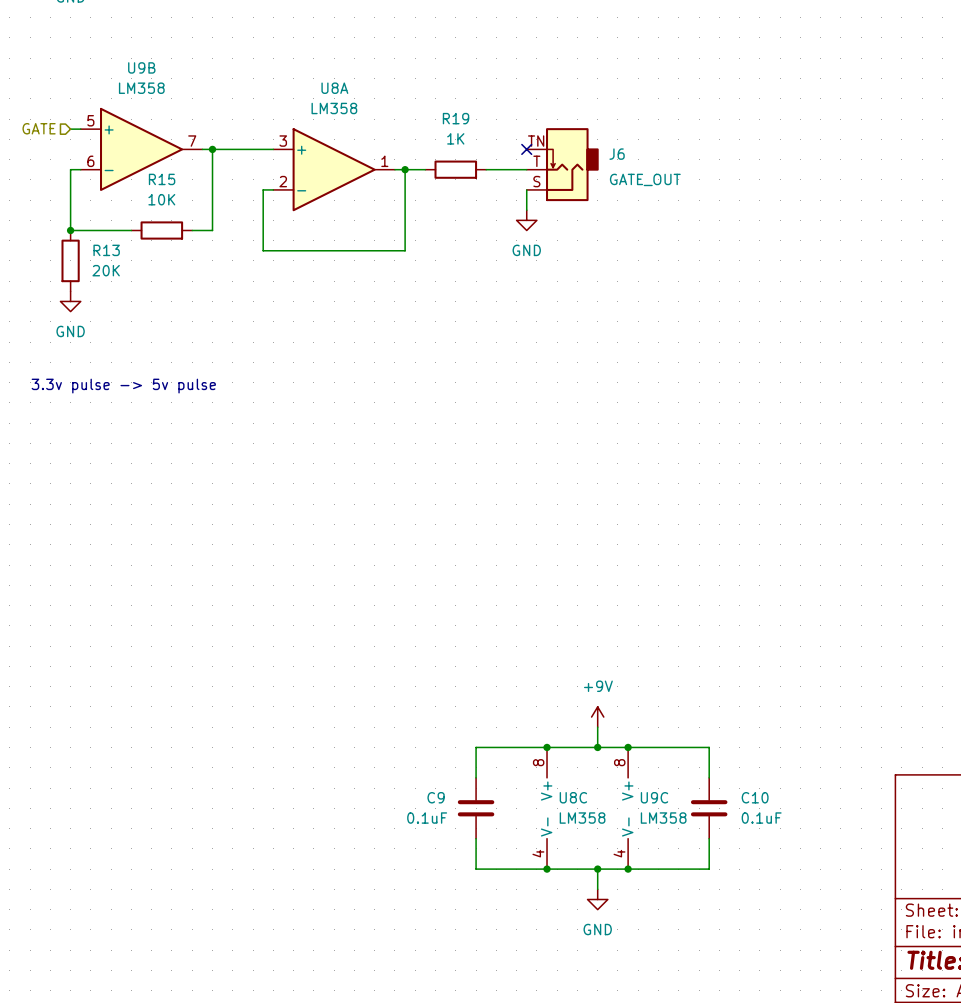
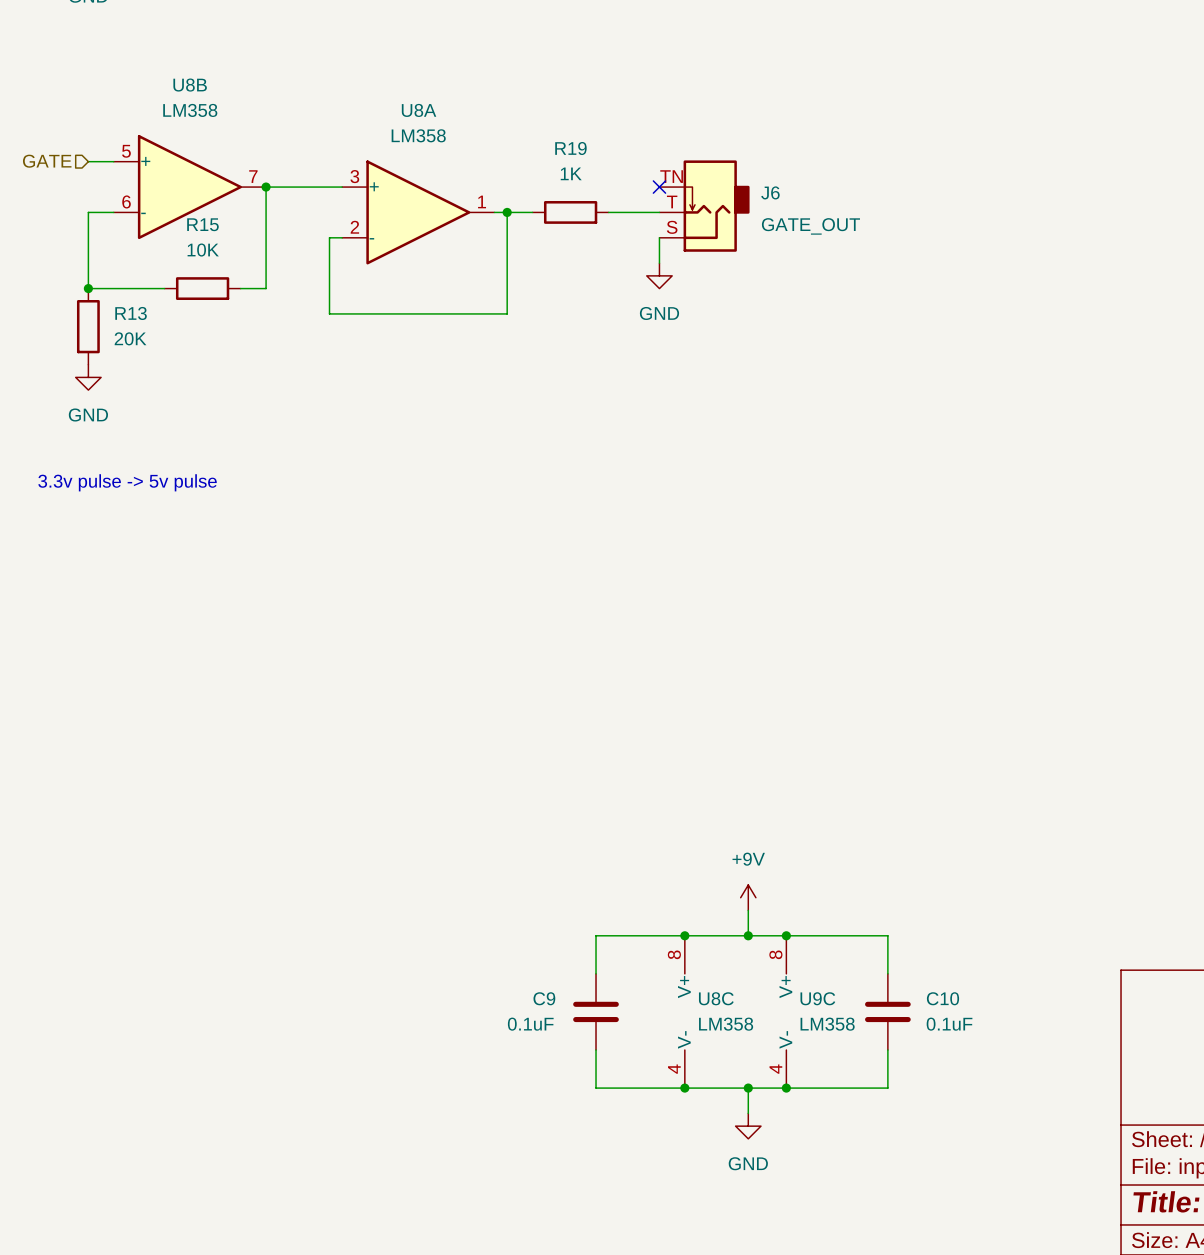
U9B: LM358 (141, 149) -> none
U8B: none -> LM358 (189, 187)

